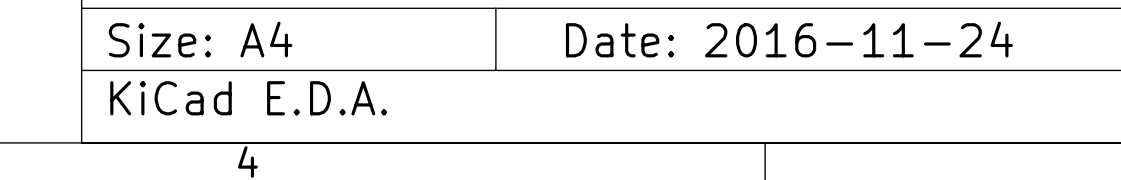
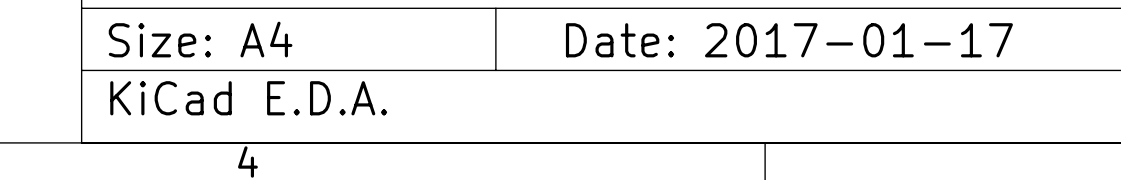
title block: Date: 2016-11-24 (789, 39) -> Date: 2017-01-17 (789, 40)

